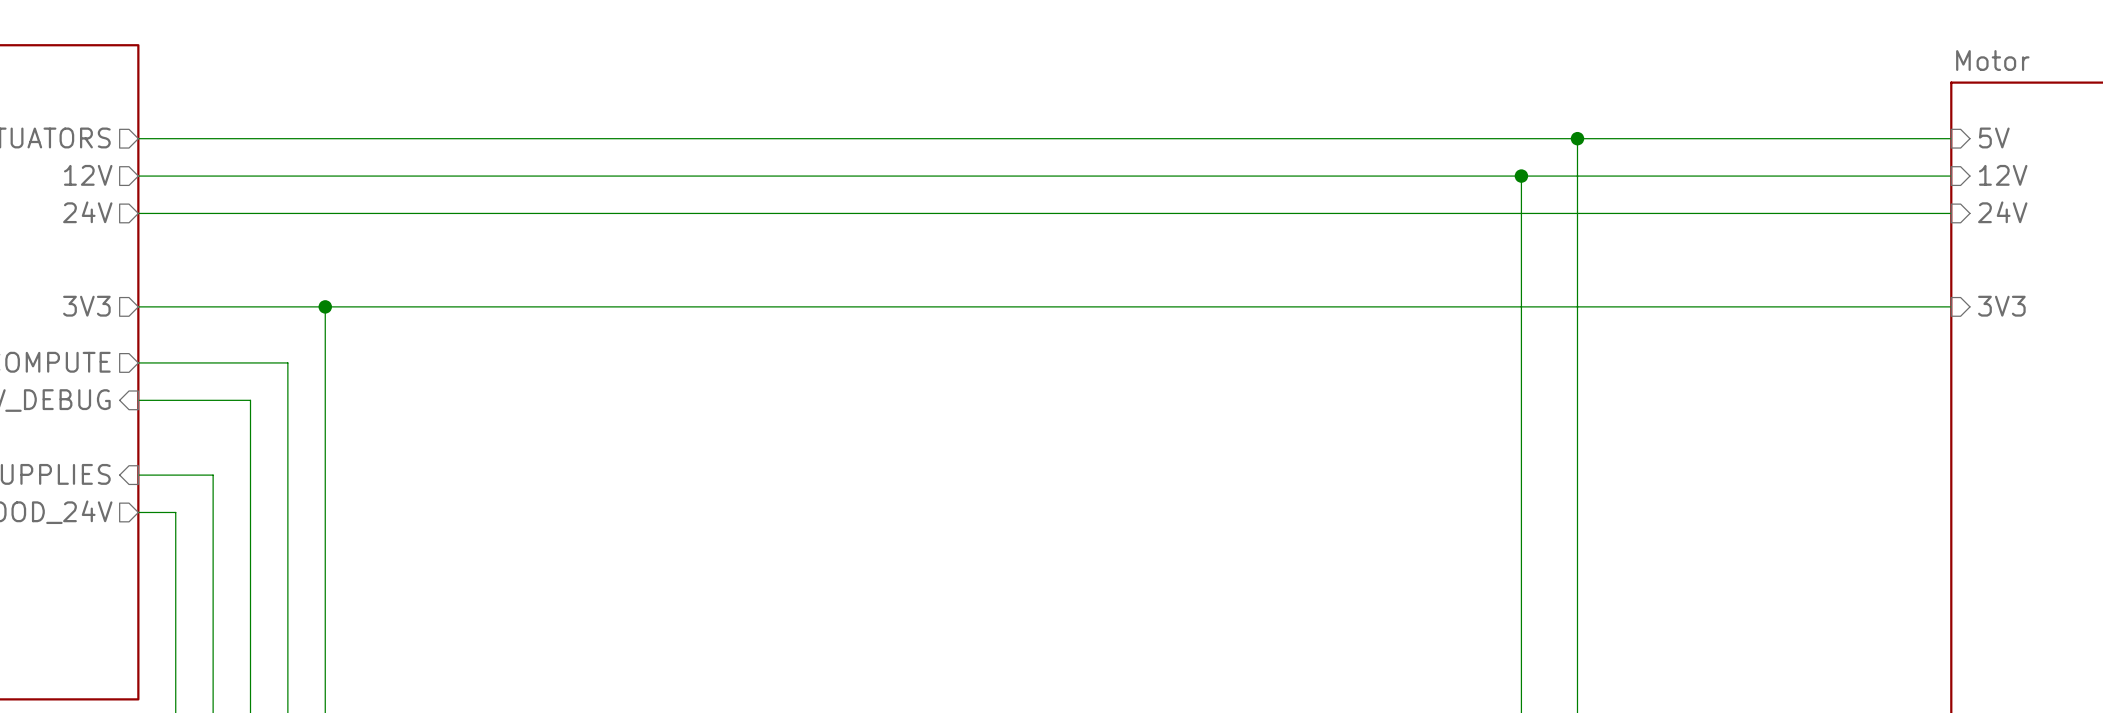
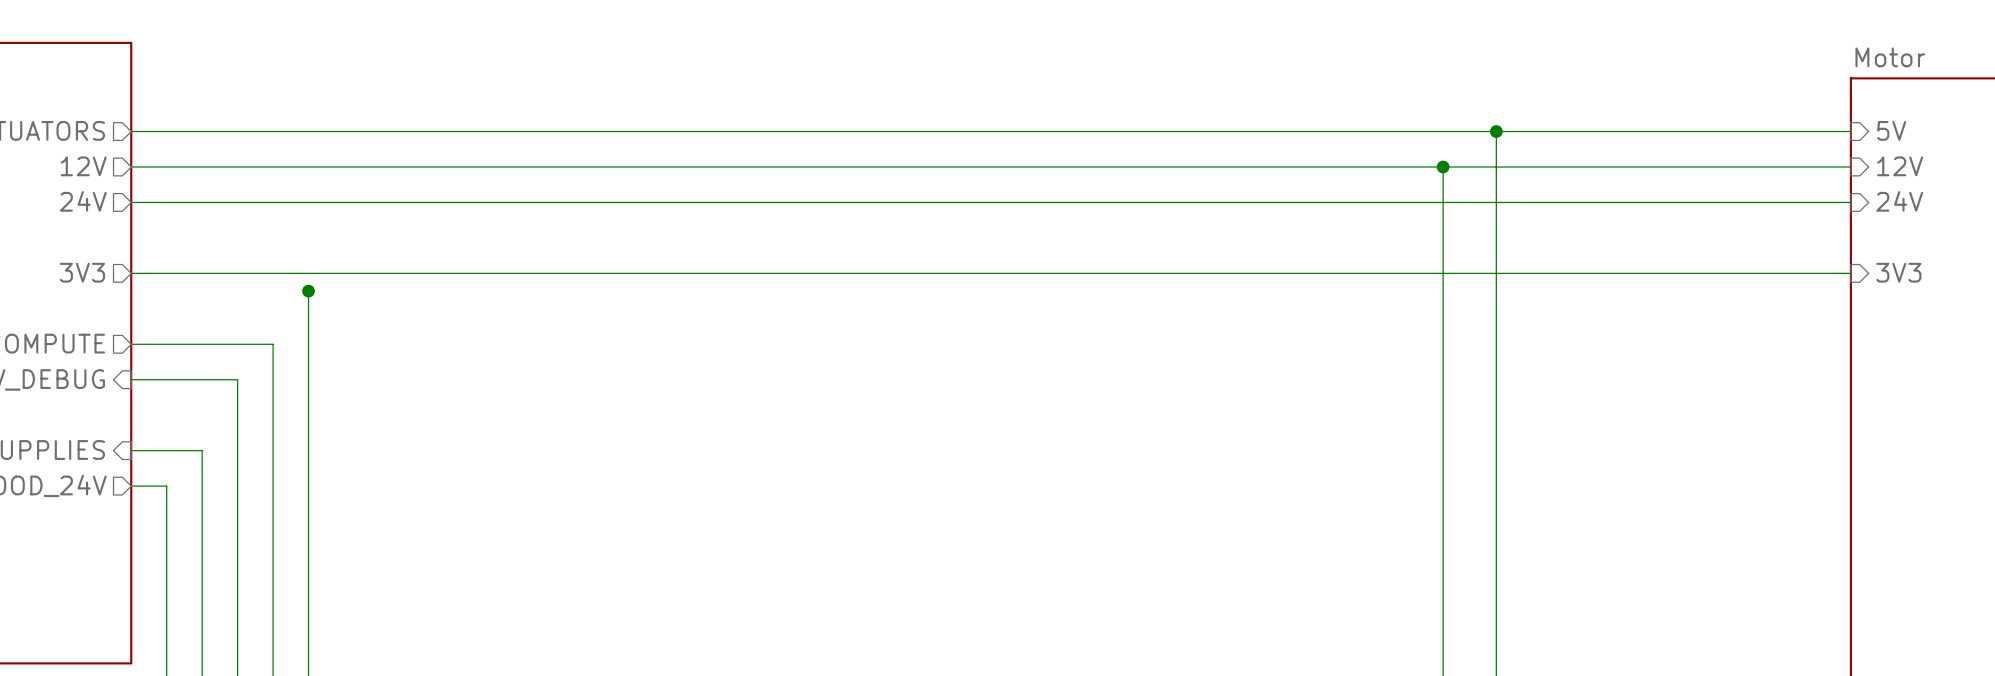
sheet pin position: 3V3 (86, 306) -> 3V3 (82, 272)
wire: (138, 306) (1951, 306) -> (131, 273) (1850, 273)
sheet pin position: 3V3 (2001, 306) -> 3V3 (1898, 272)

